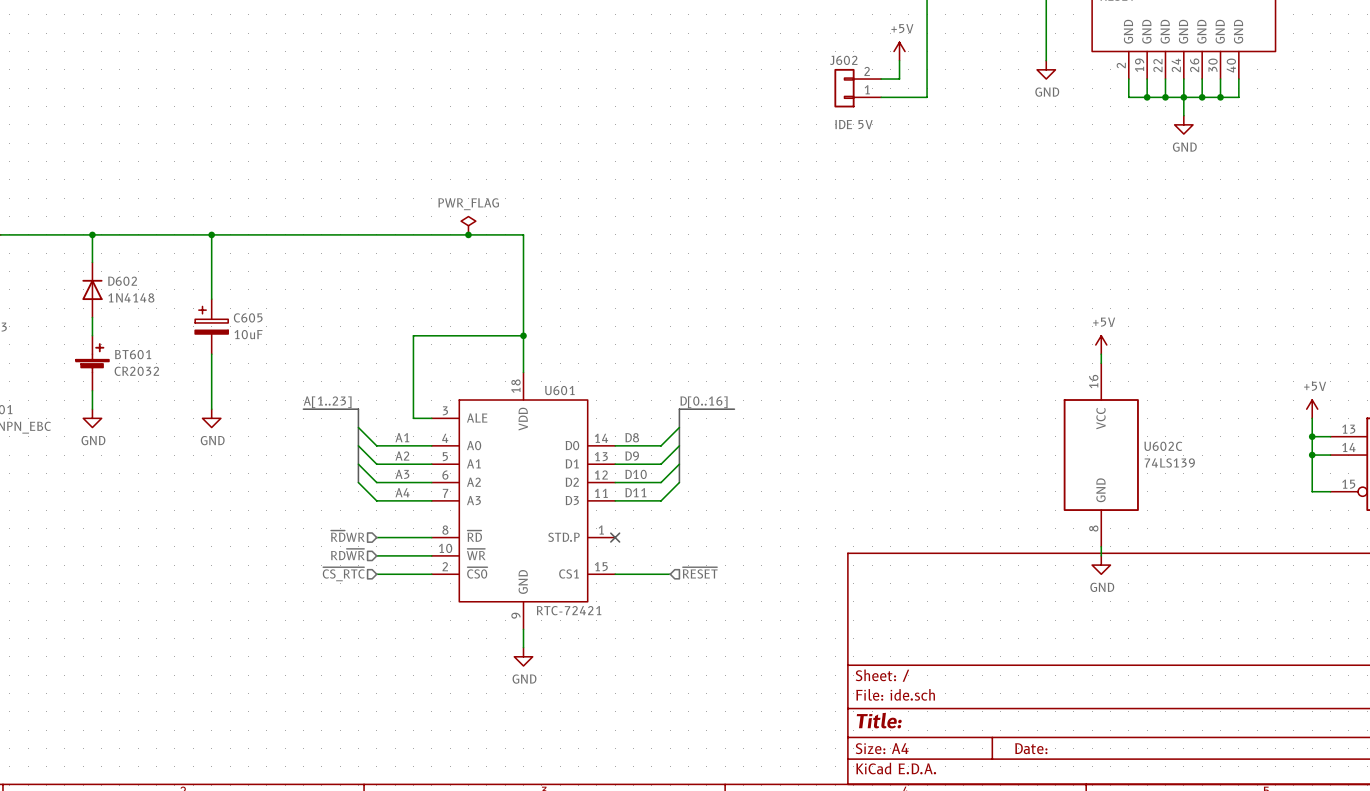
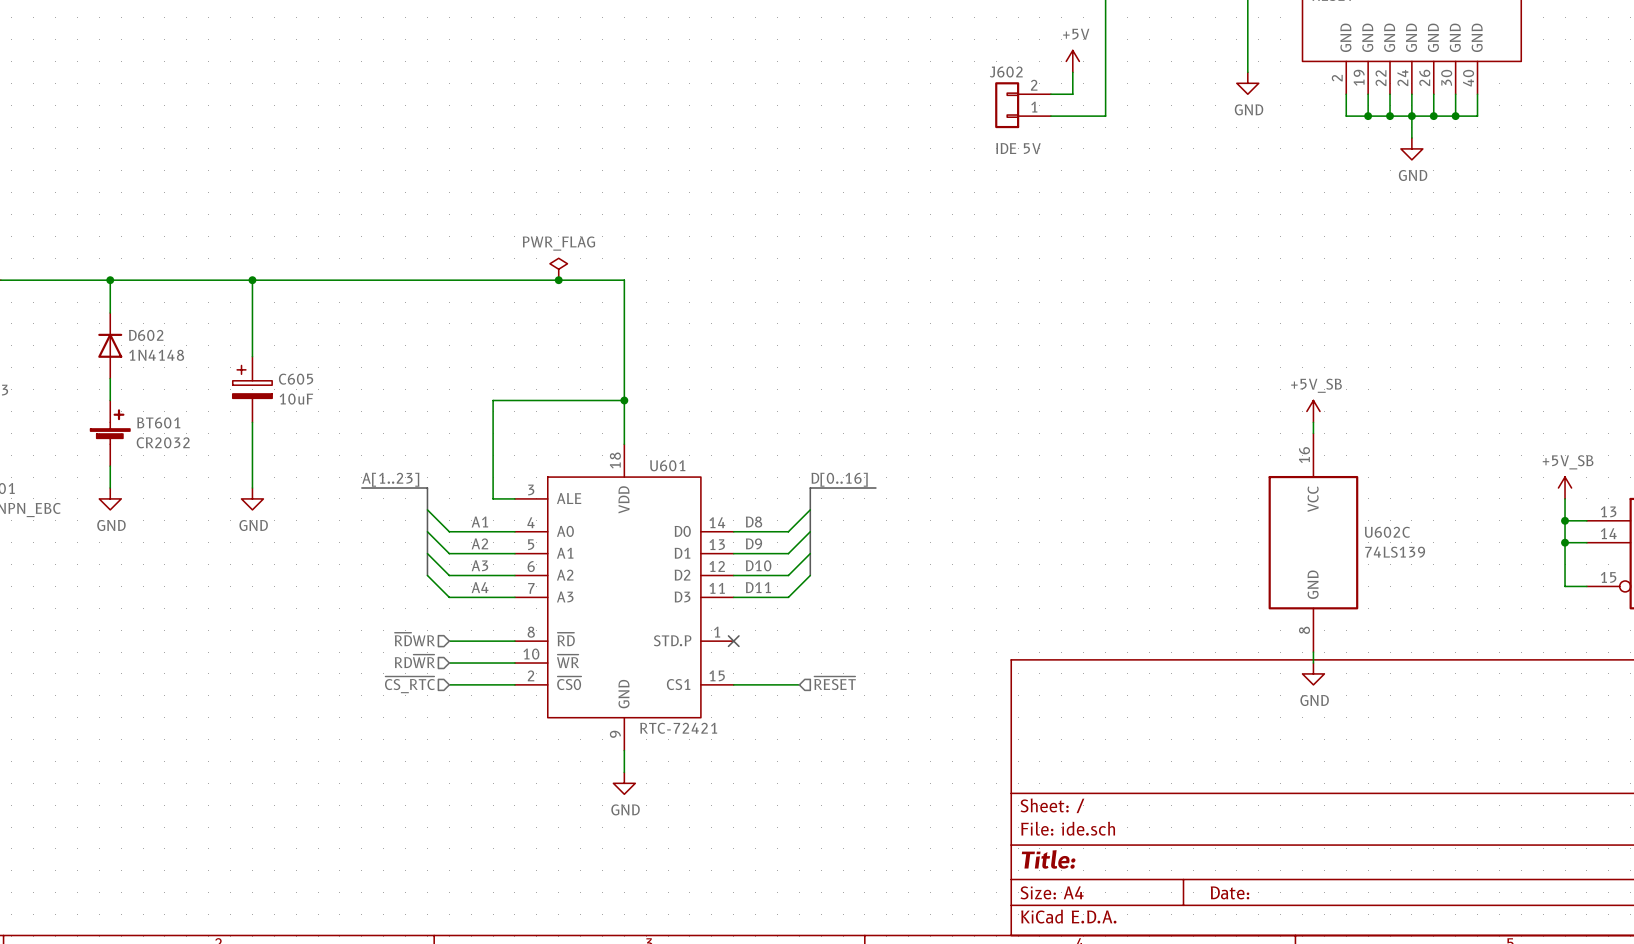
power symbol: +5V (1101, 344) -> +5V_SB (1313, 411)
power symbol: +5V (1312, 409) -> +5V_SB (1565, 488)

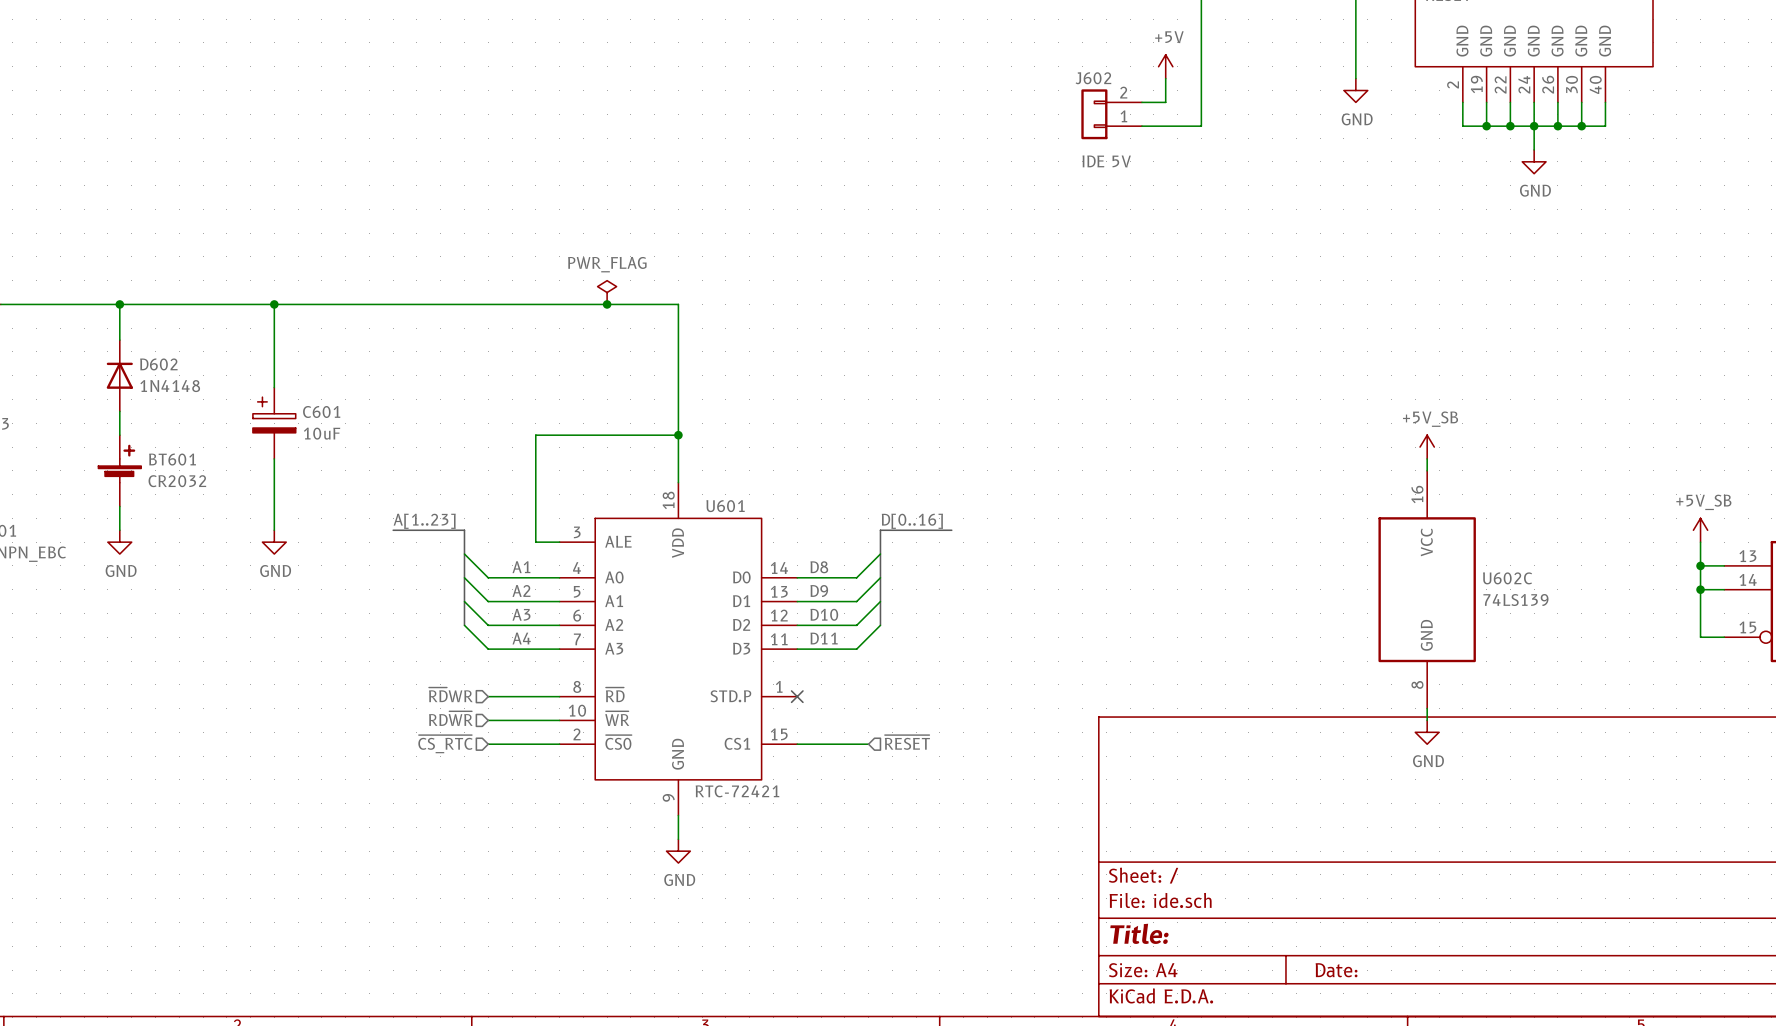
C605 name: C605 (296, 379) -> C601 (321, 411)

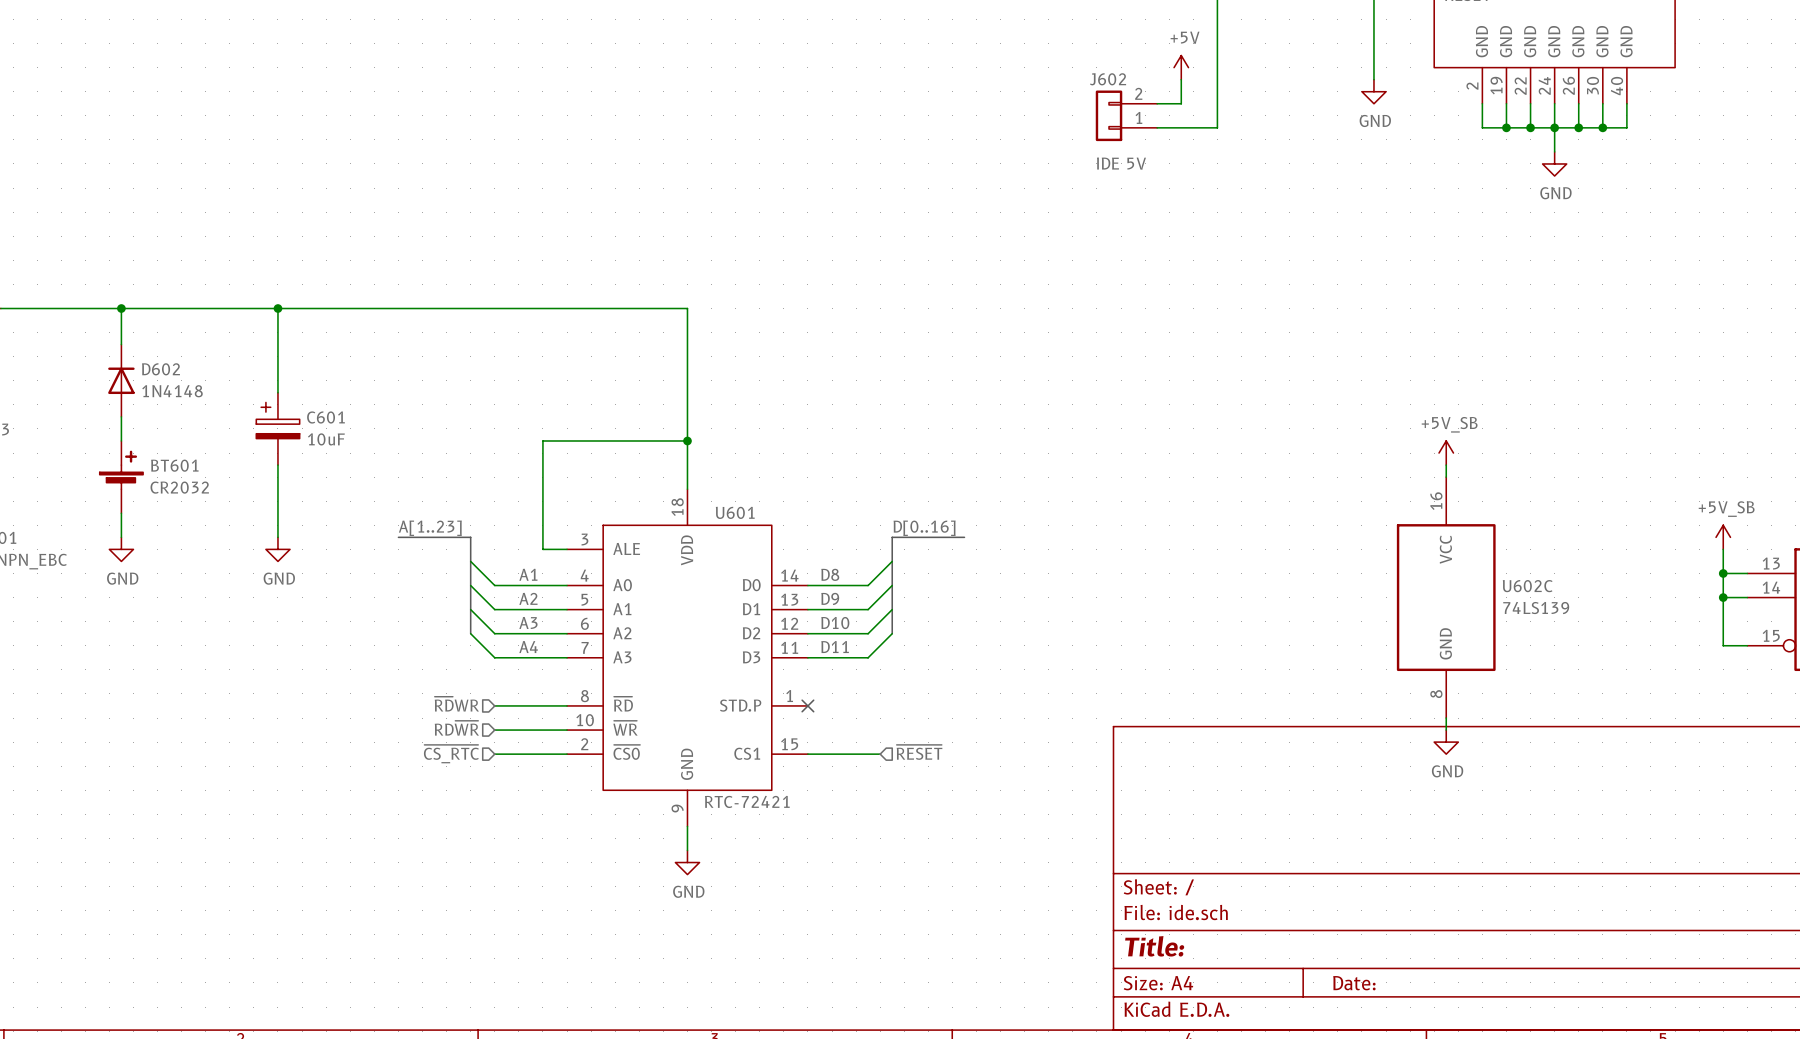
power symbol: PWR_FLAG (607, 292) -> none
junction: (607, 304) -> none

